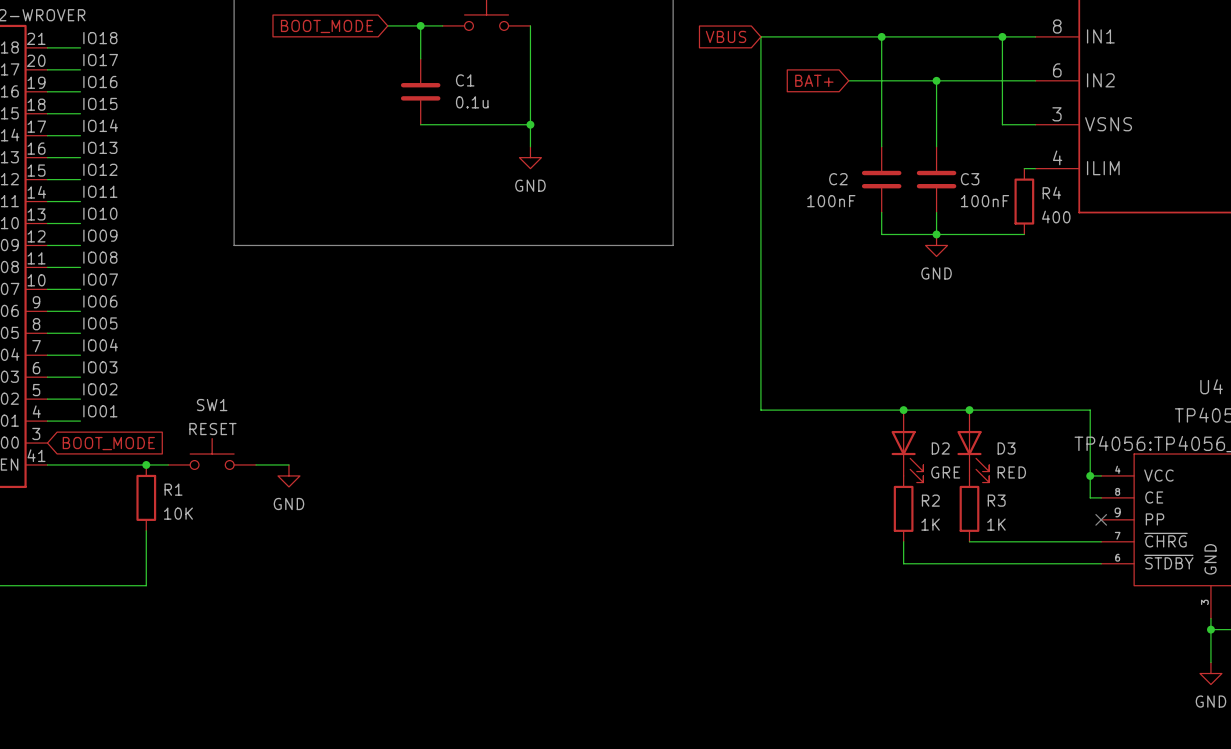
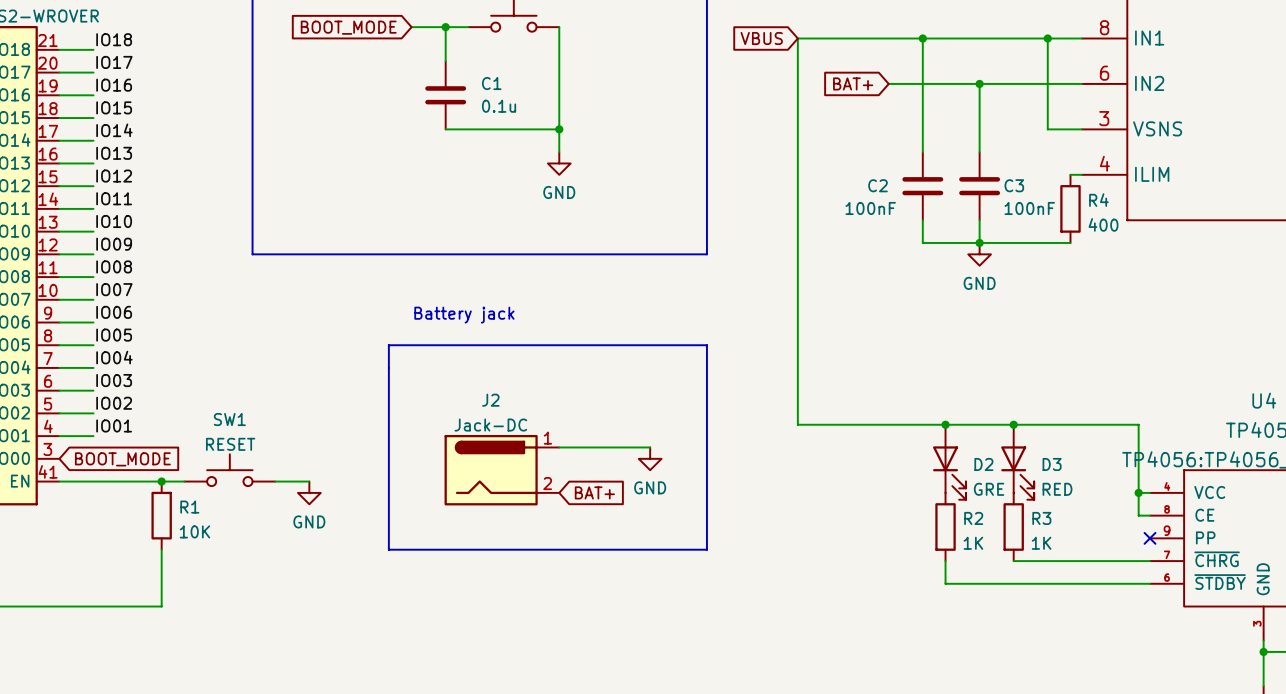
text: none -> Battery jack (464, 315)
line: none -> (388, 345) (388, 549) (706, 549) (706, 345) (388, 345)
wire: none -> (559, 447) (650, 447)
power symbol: none -> GND (650, 458)
J2: none -> Jack-DC (501, 470)
global label: none -> BAT+ (594, 492)

